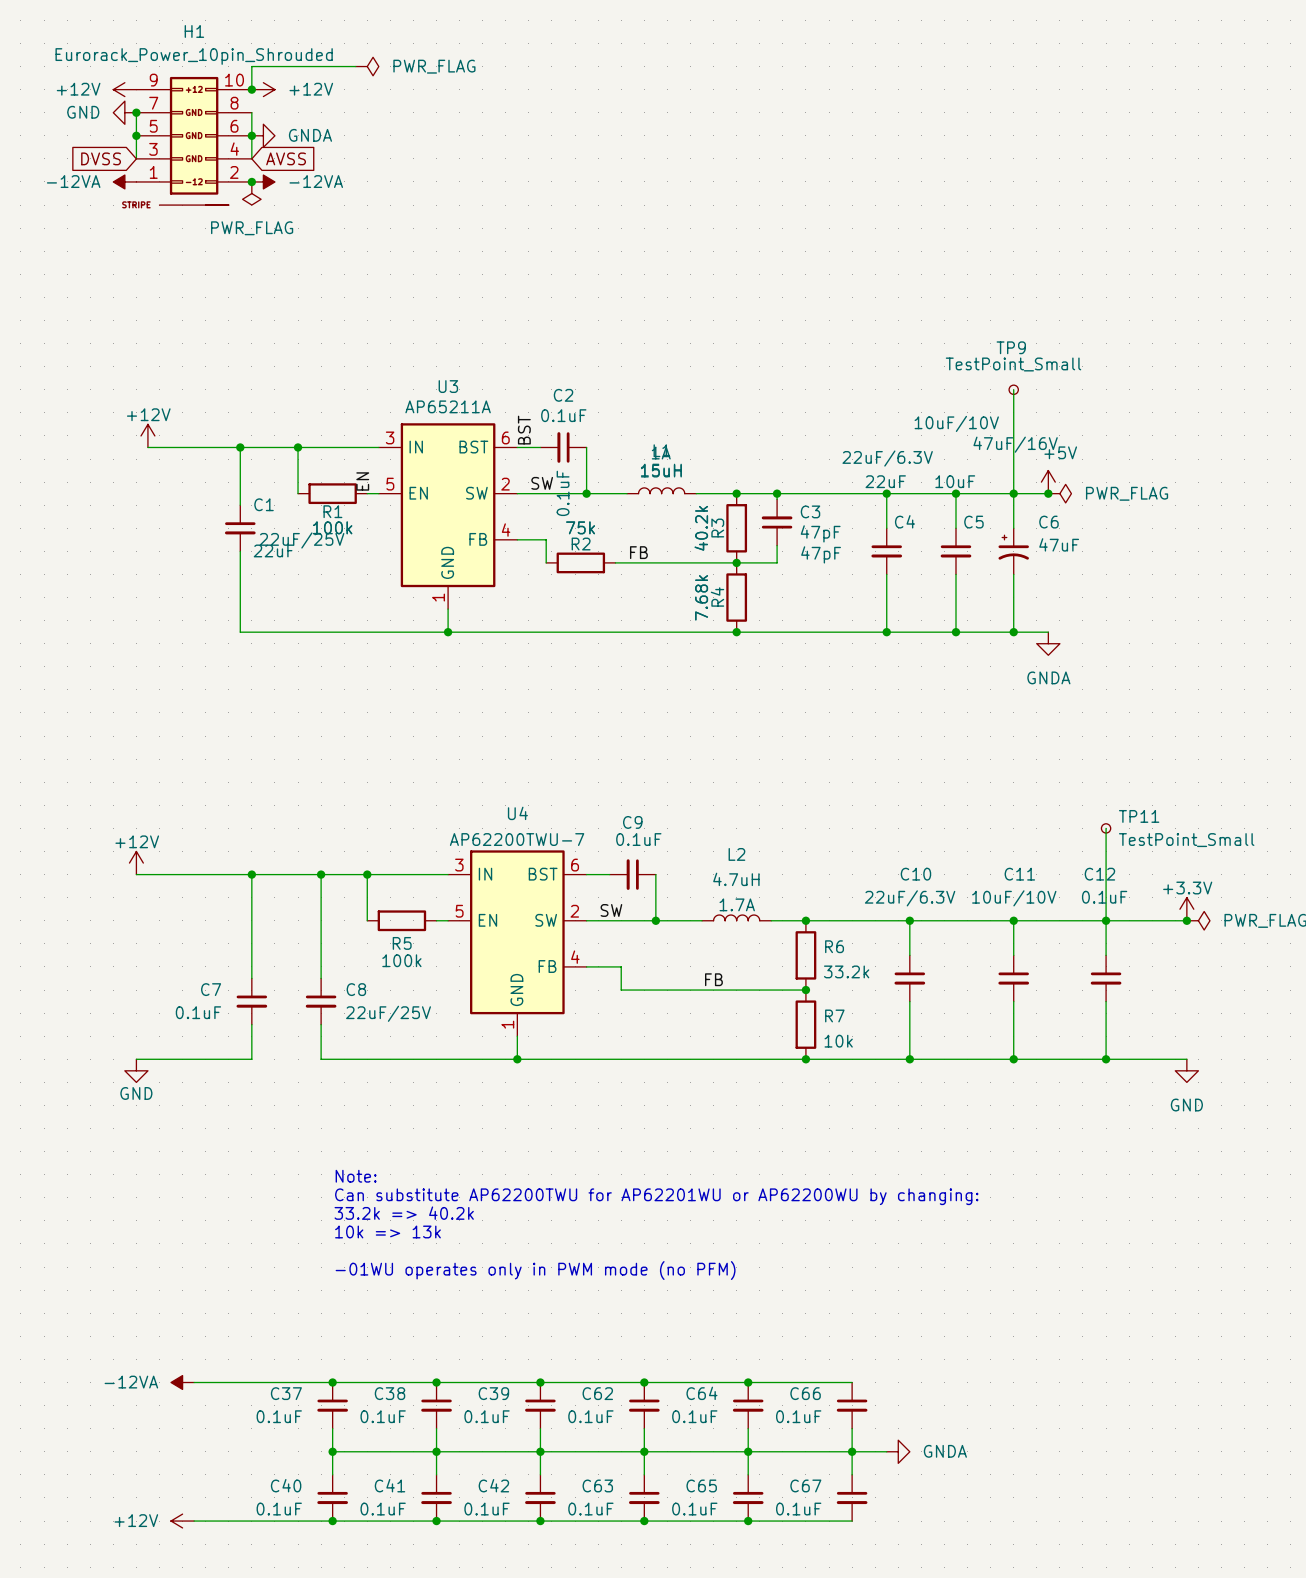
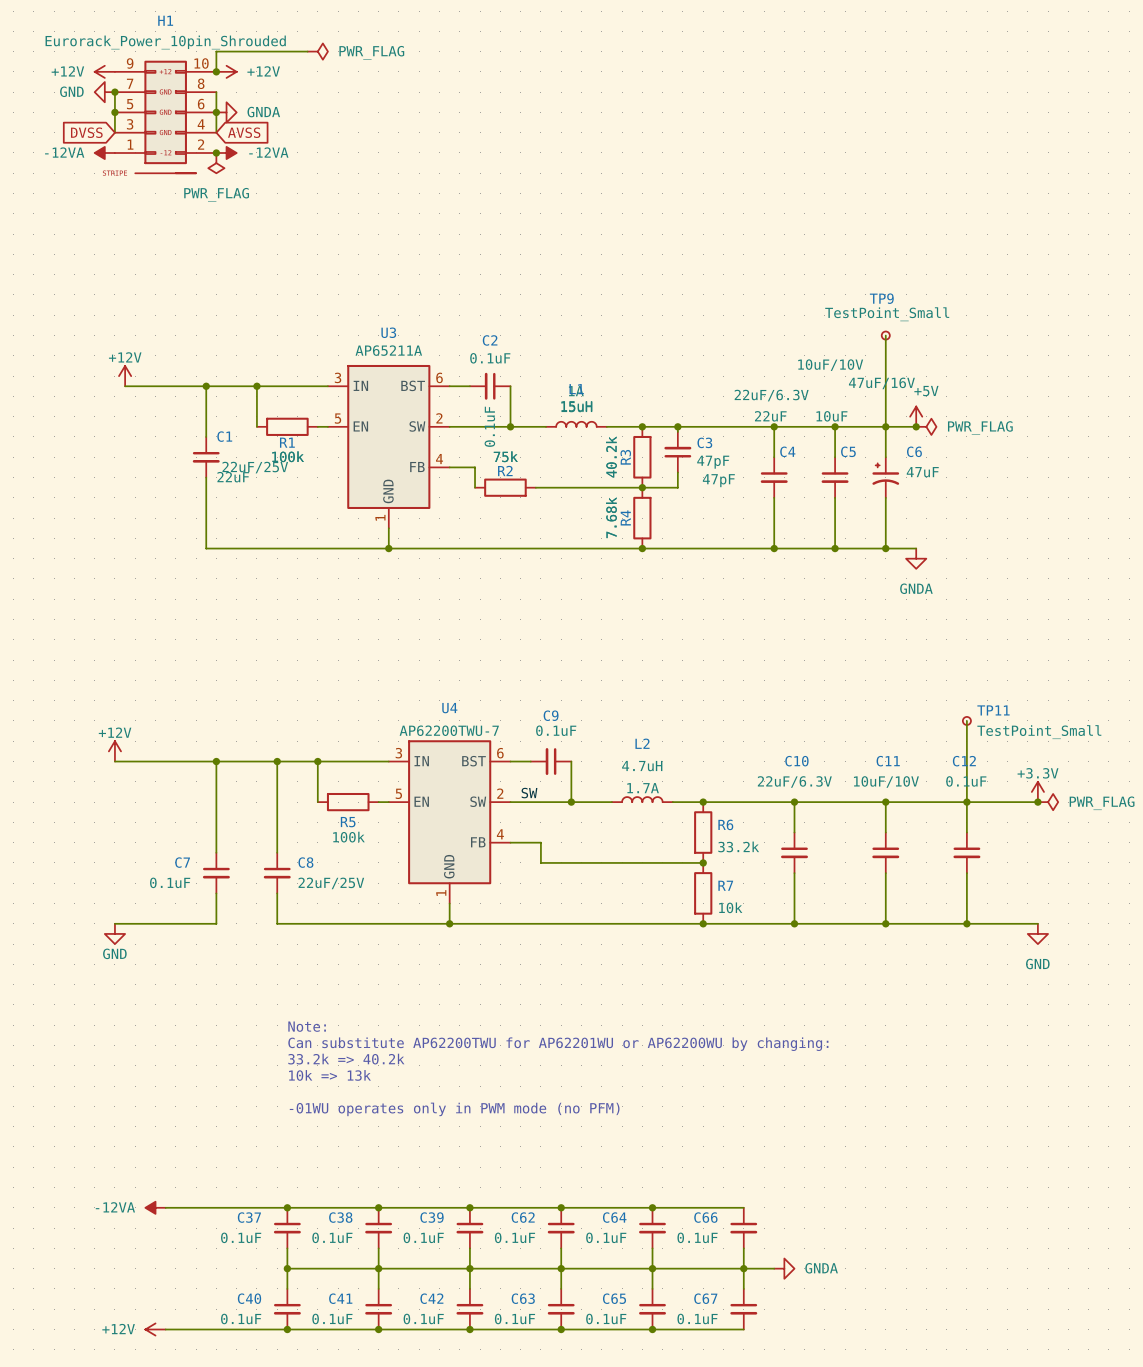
label: BST (524, 430) -> none
label: EN (362, 481) -> none
label: SW (542, 483) -> none
label: FB (638, 552) -> none
label: FB (713, 979) -> none

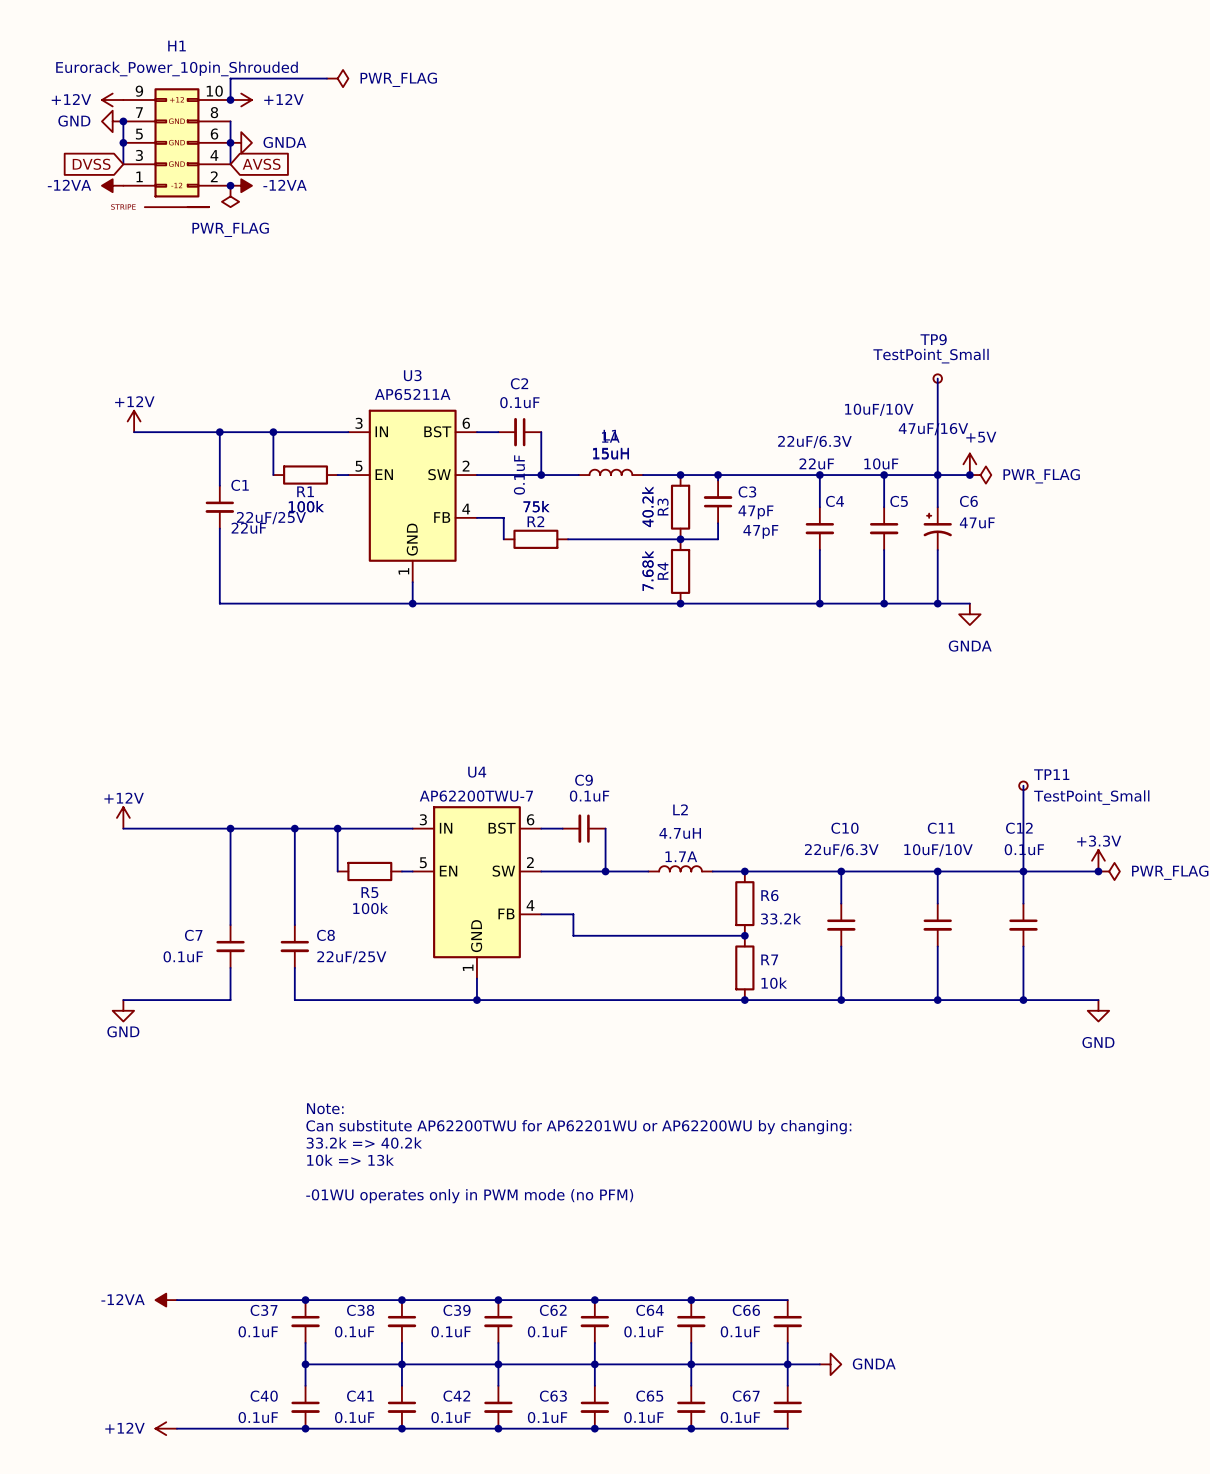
label: SW (529, 793) -> none

